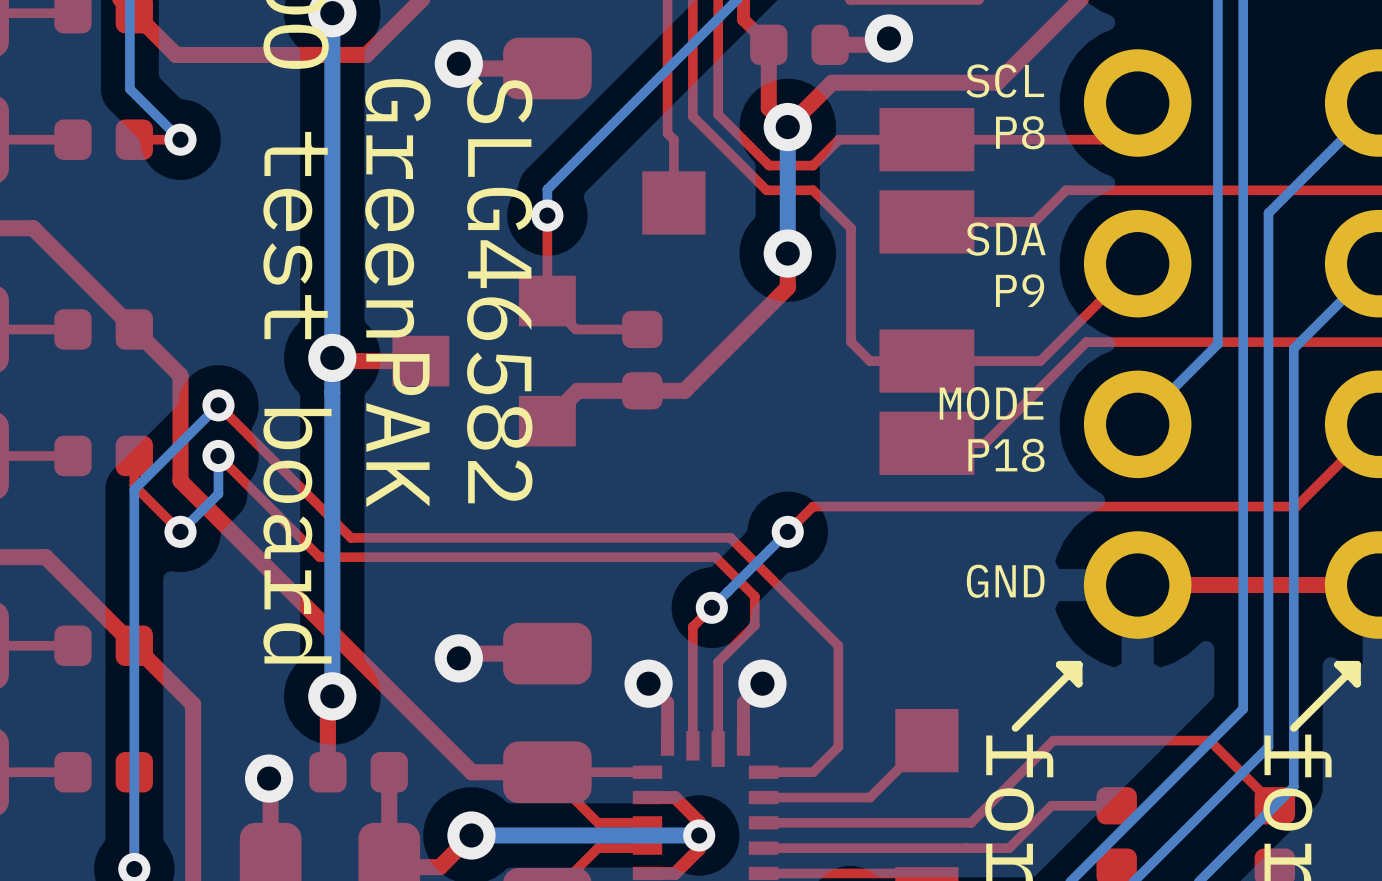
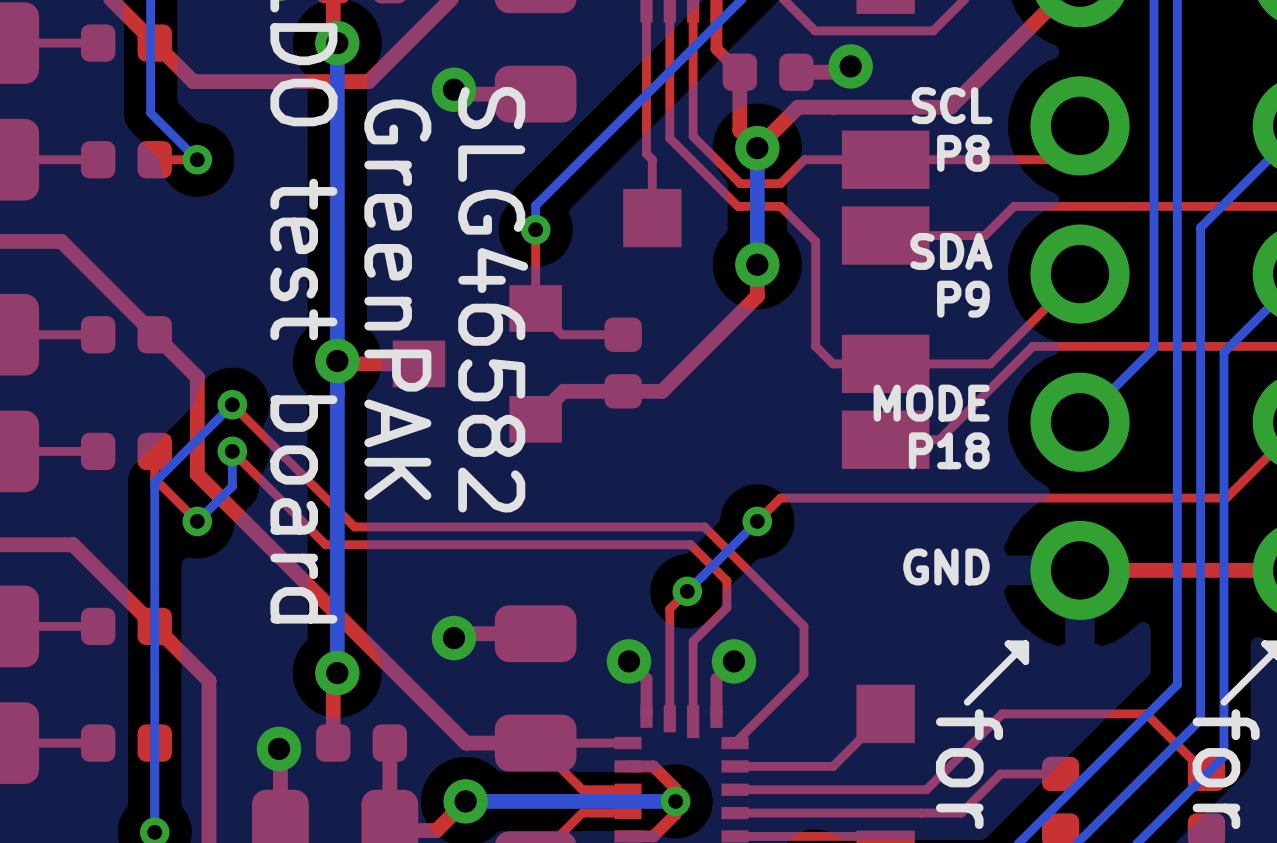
top track: (838, 697) (838, 746) (813, 772) (763, 772) -> (803, 674) (735, 743)

